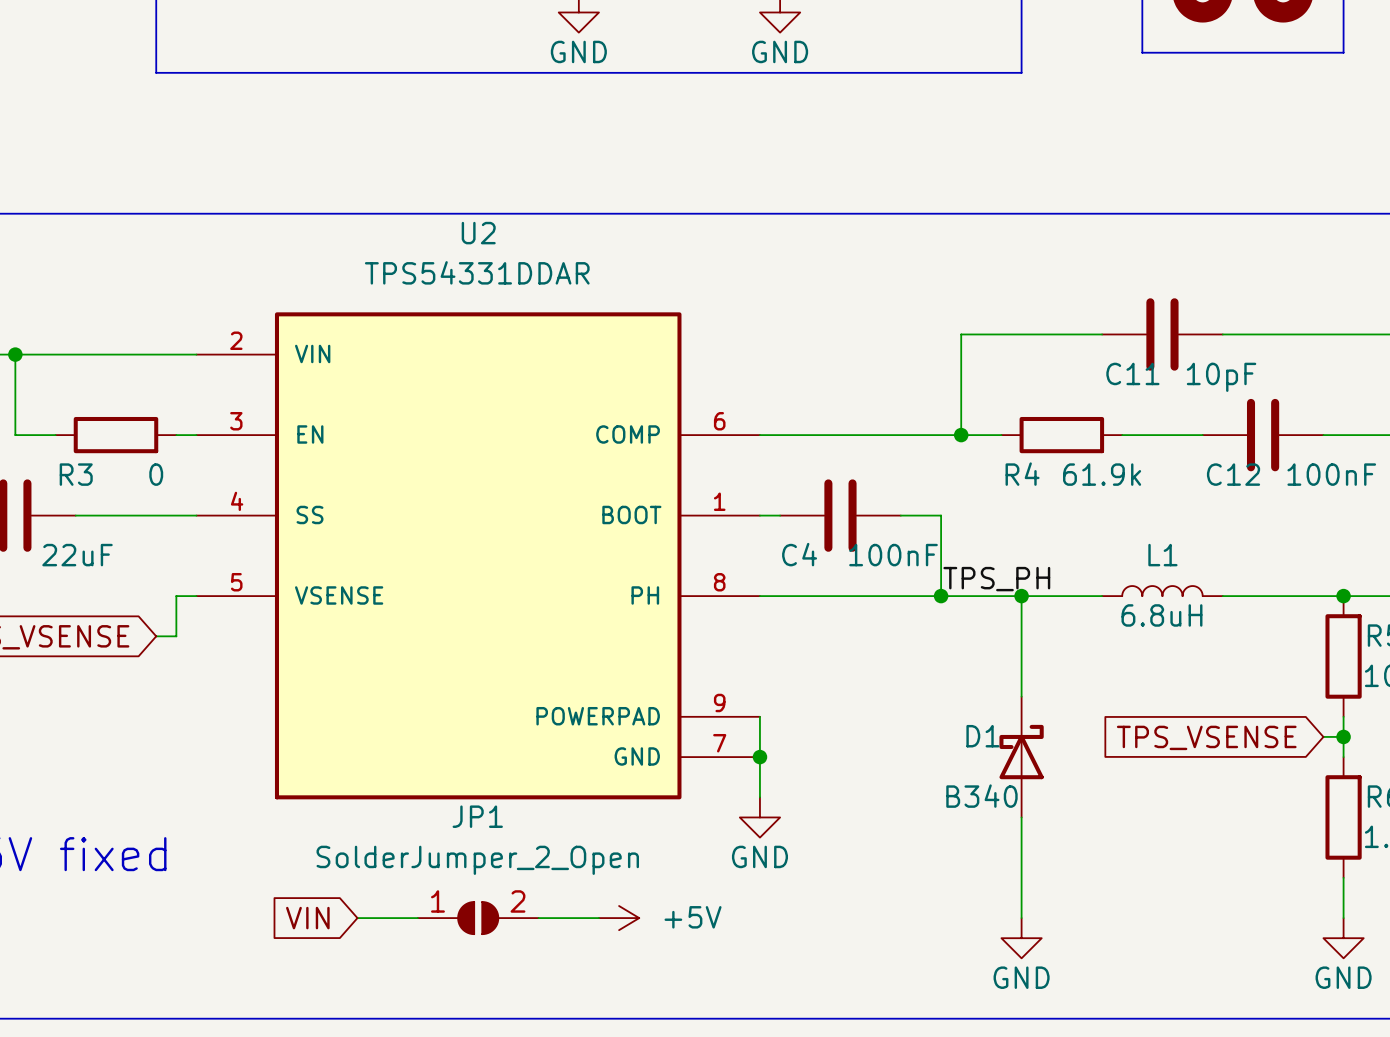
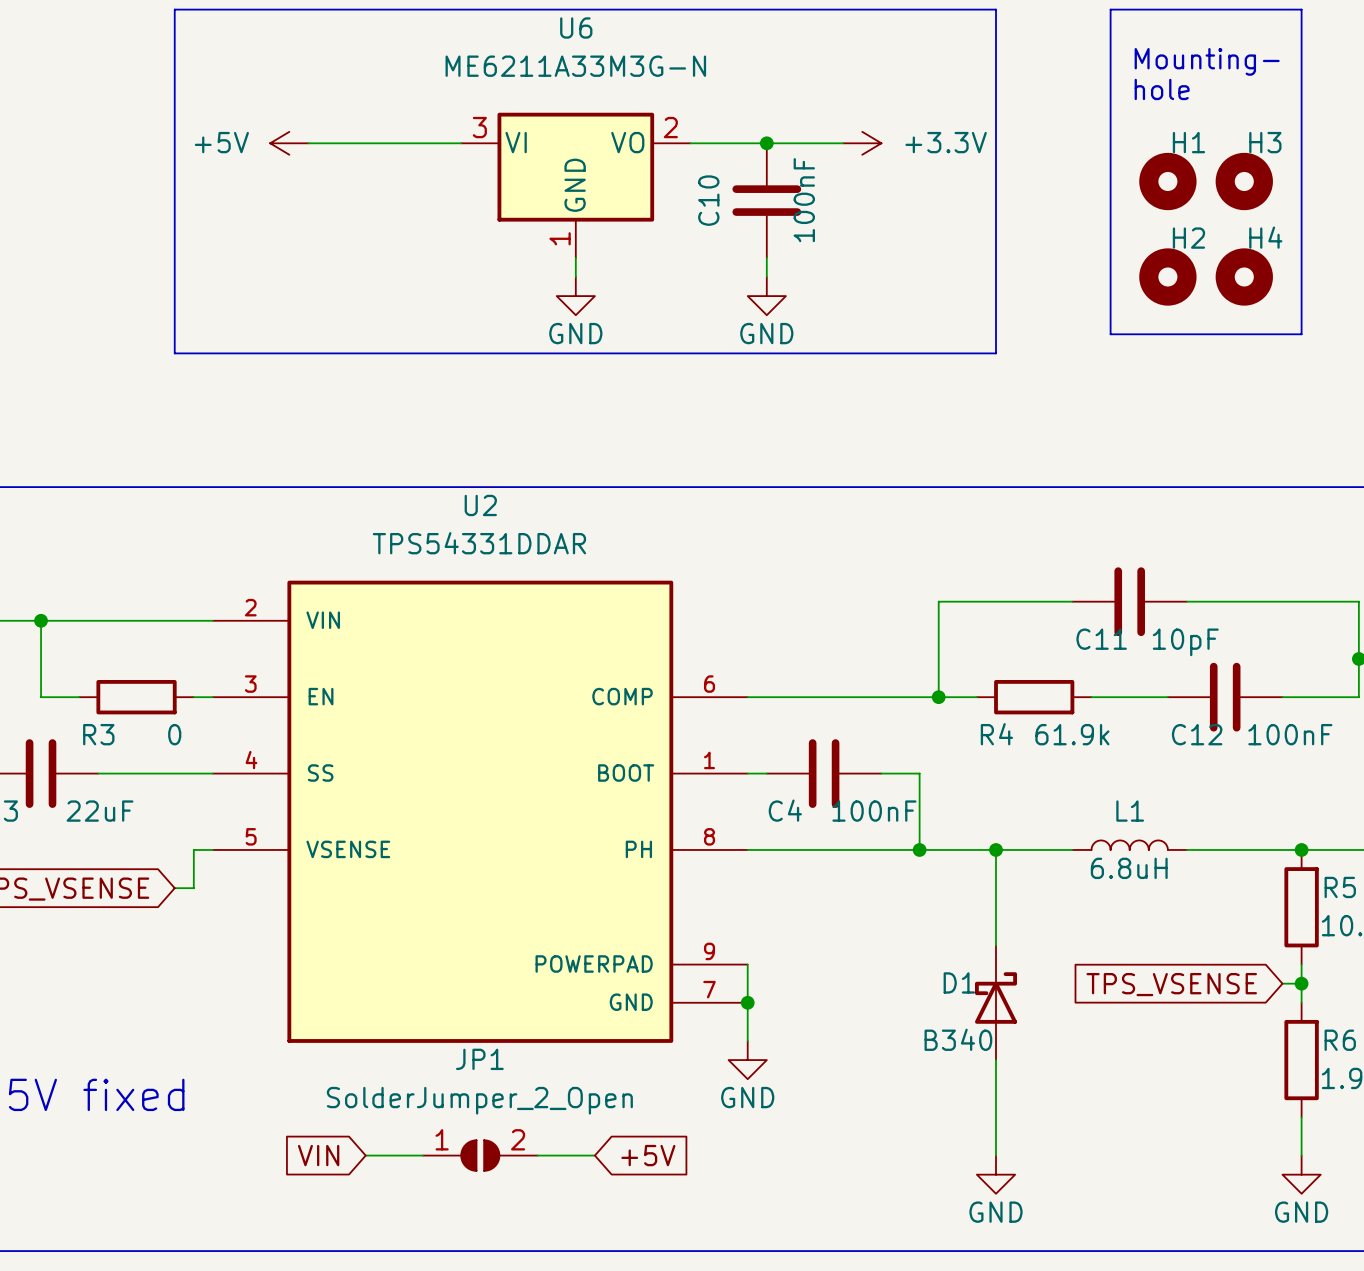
label: TPS_PH (996, 579) -> none
power symbol: +5V (619, 918) -> none
global label: none -> +5V (648, 1155)

